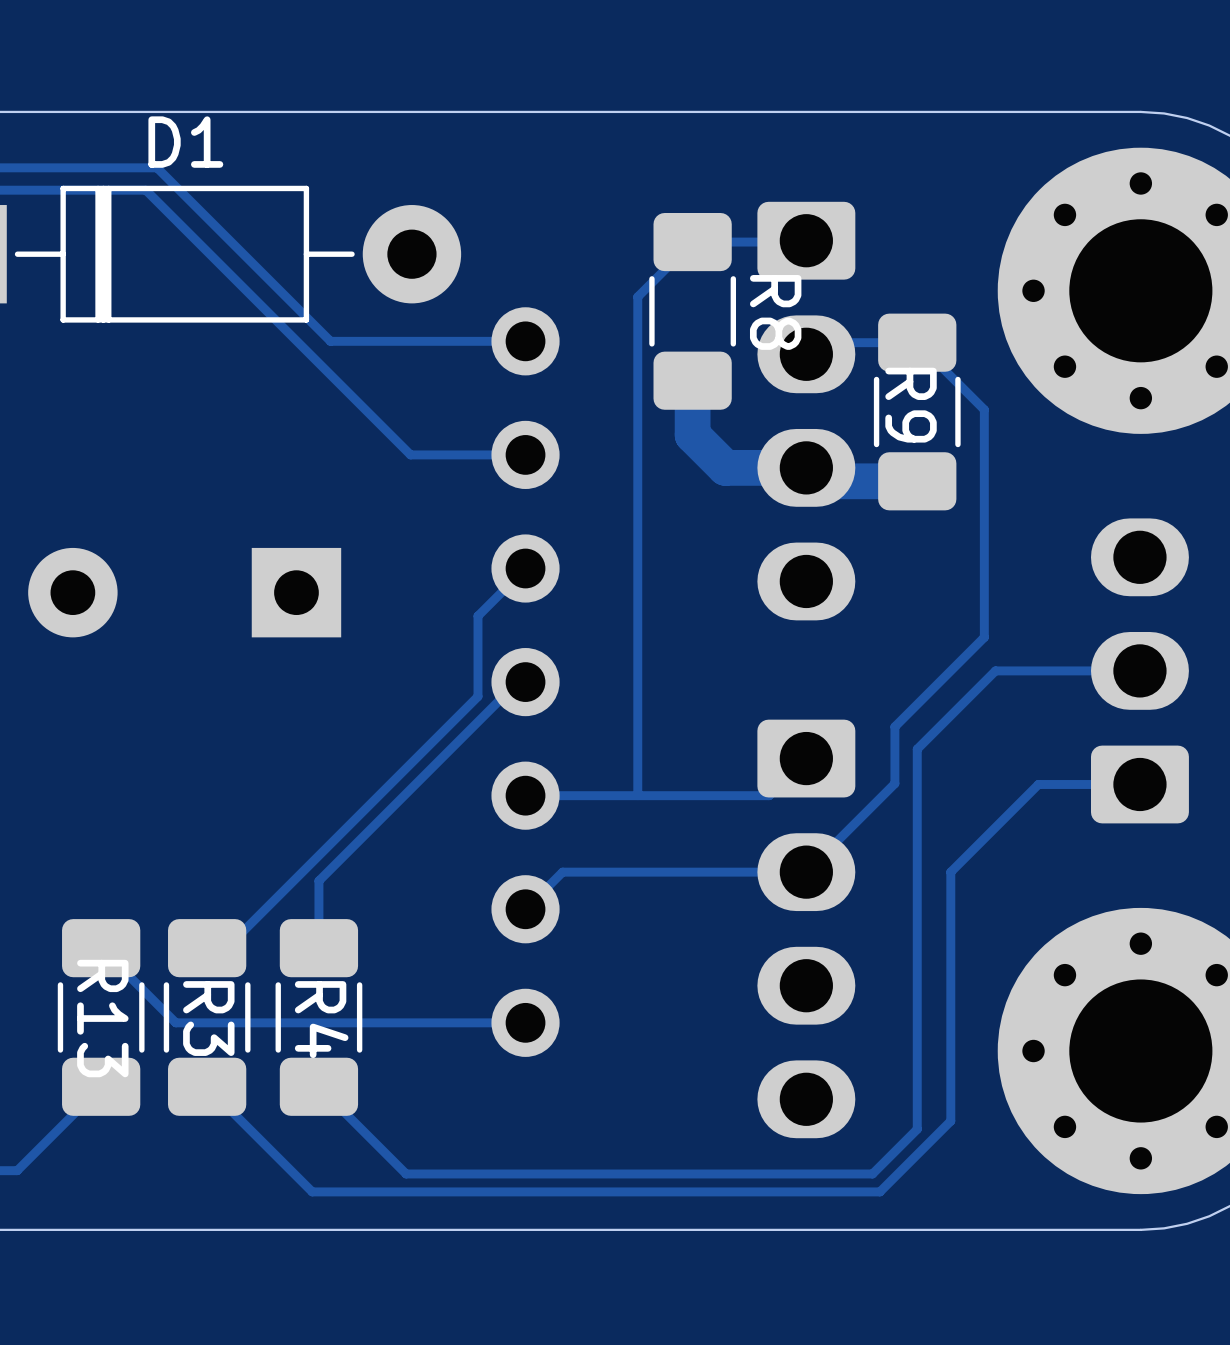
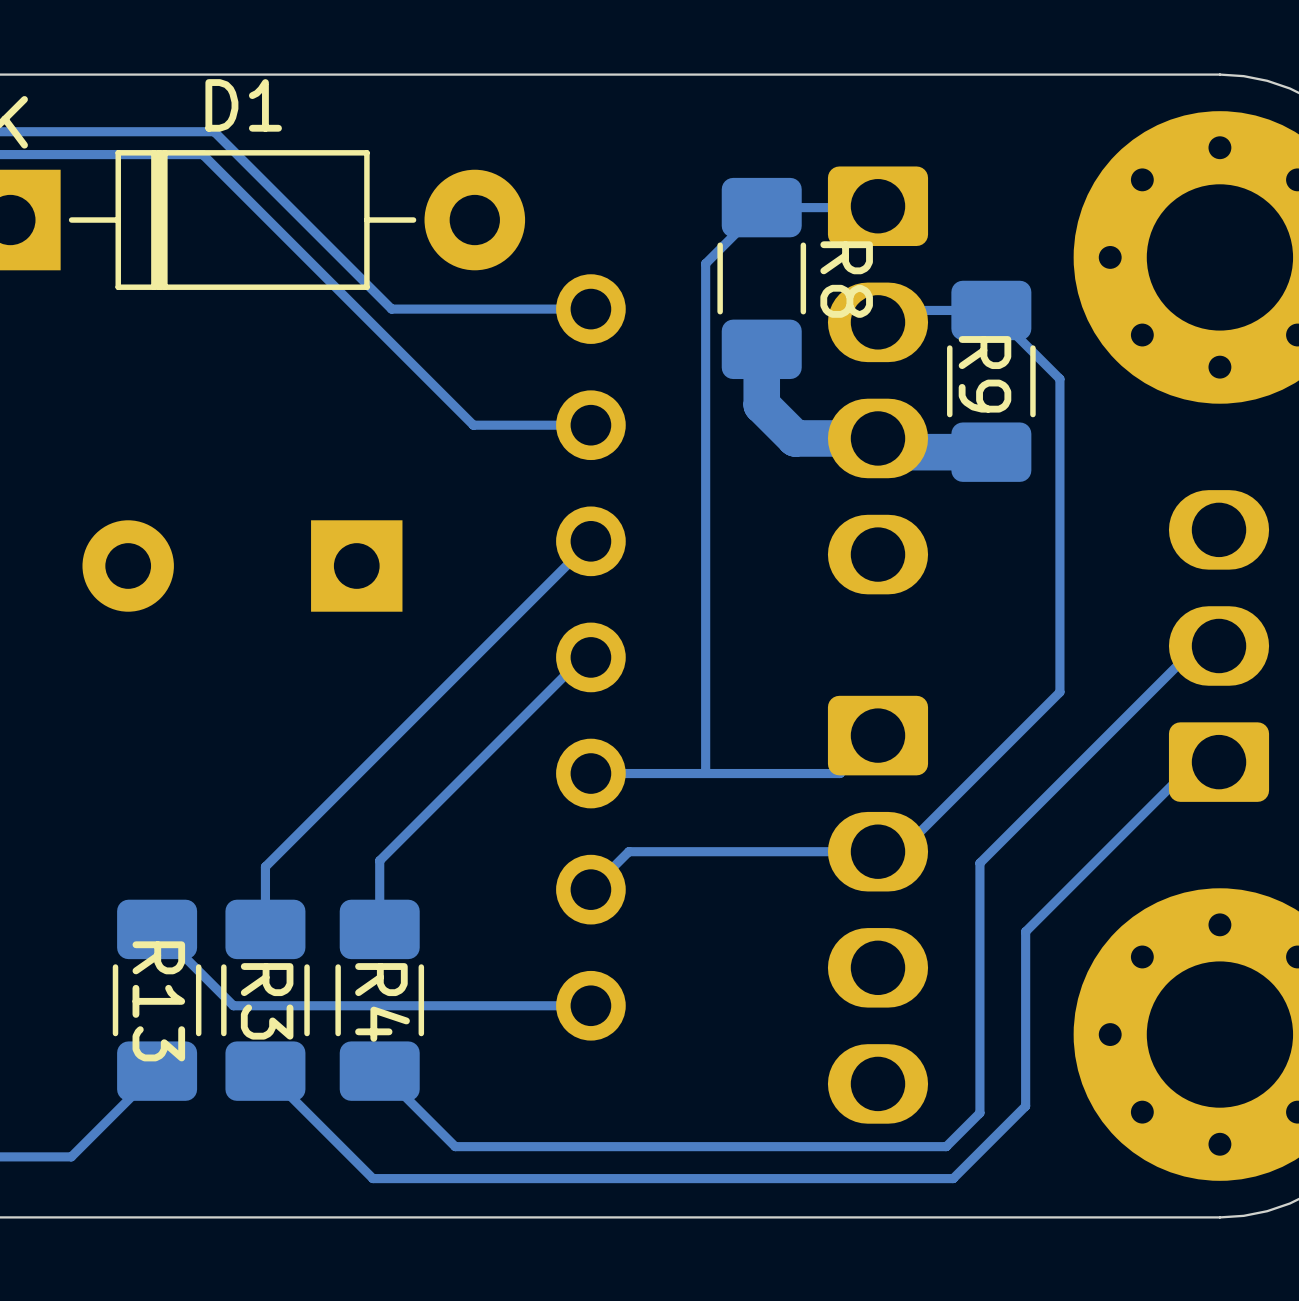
track: (477, 616) (477, 696) (226, 948) (207, 948) -> (542, 589) (265, 866) (265, 929)
track: (984, 637) (894, 726) (894, 783) (806, 872) -> (1059, 611) (1059, 692) (900, 851) (877, 851)
track: (1118, 670) (995, 670) (917, 749) (917, 1129) (872, 1173) (406, 1173) (392, 1160) -> (1197, 645) (979, 863) (979, 1113) (946, 1146) (455, 1146)
track: (1116, 784) (1038, 784) (950, 872) (950, 950) -> (1195, 762) (1025, 931)

